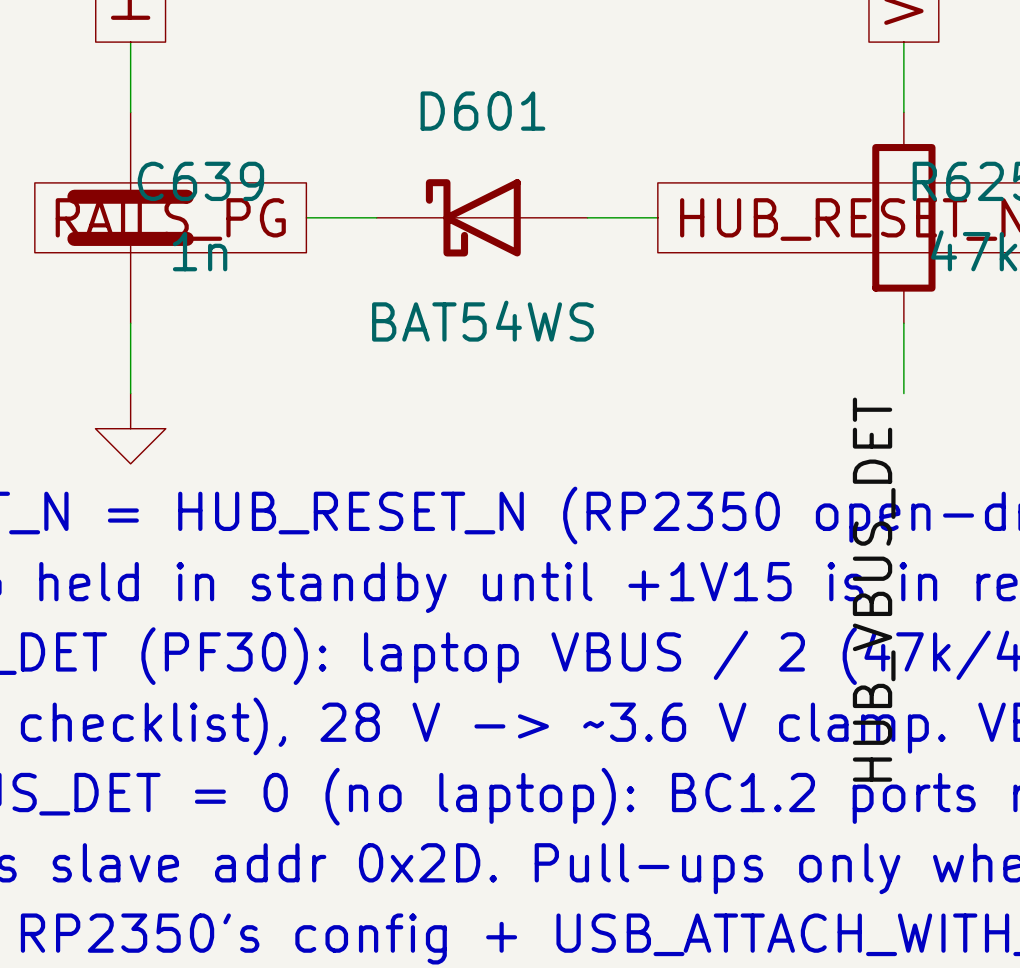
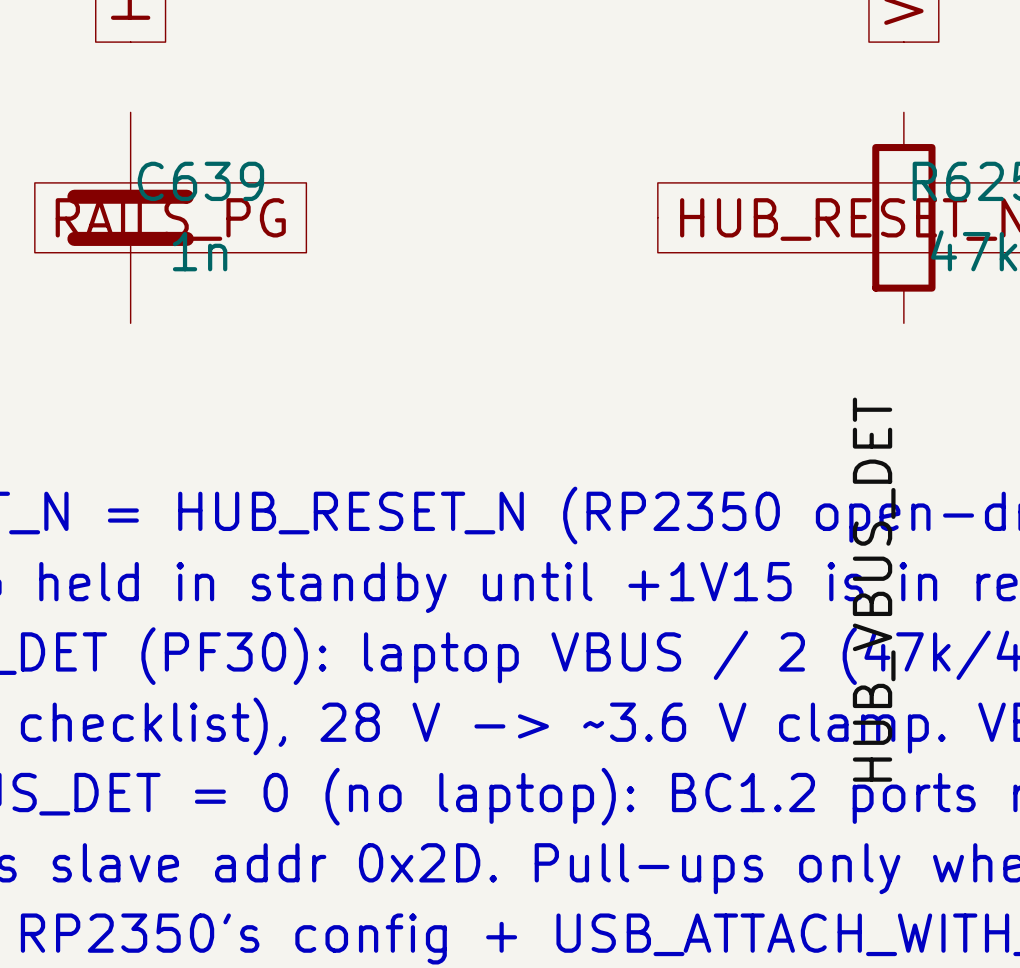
wire: (130, 42) (130, 112) -> none
wire: (903, 42) (903, 112) -> none
wire: (306, 217) (376, 217) -> none
D601: BAT54WS (482, 217) -> none
wire: (587, 217) (657, 217) -> none
wire: (130, 323) (130, 393) -> none
wire: (903, 323) (903, 393) -> none
power symbol: (130, 428) -> none

